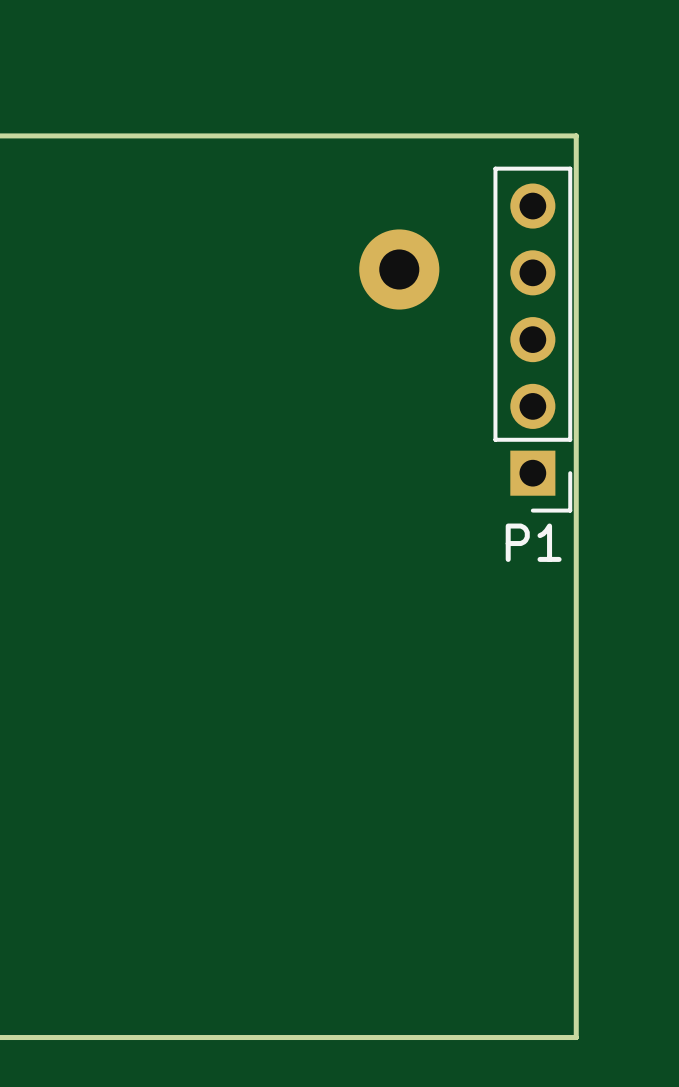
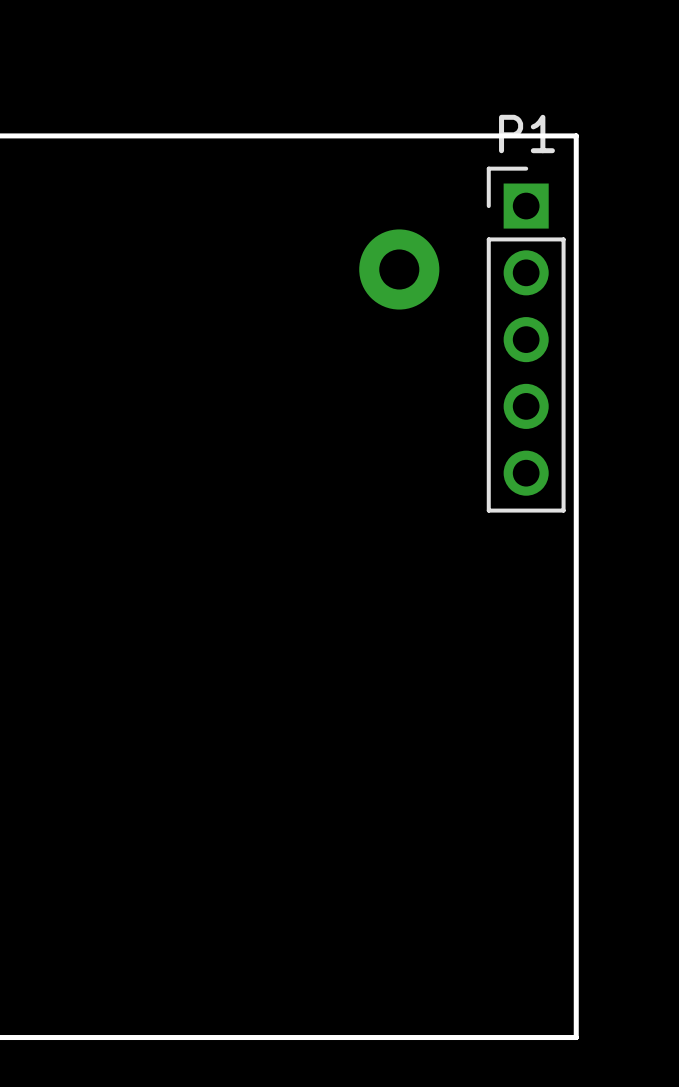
P1 rotation: 0° (532, 339) -> 180° (526, 339)

